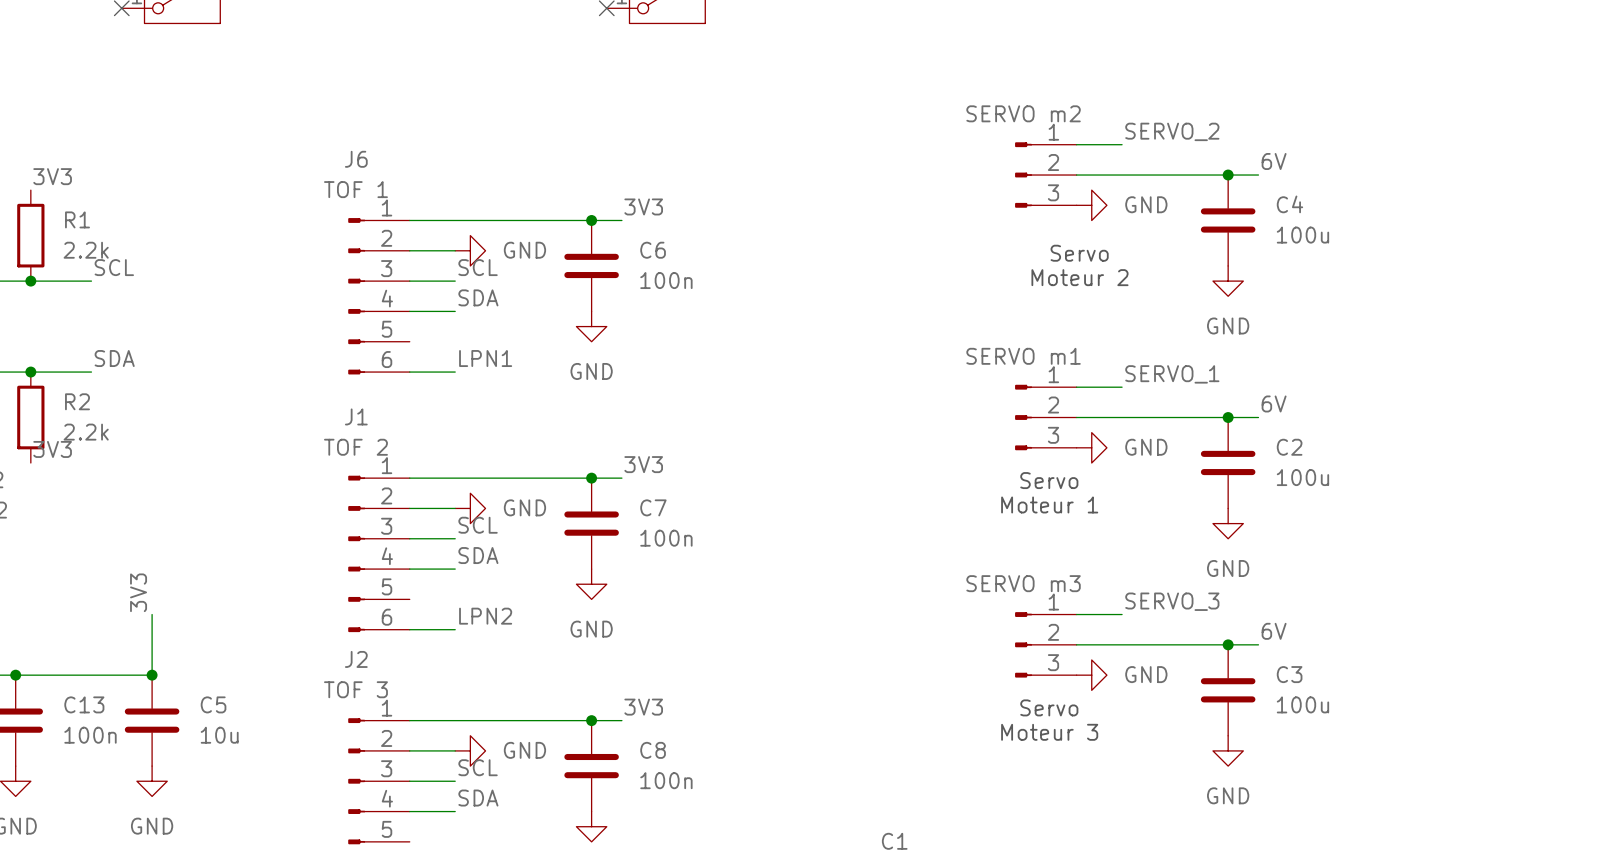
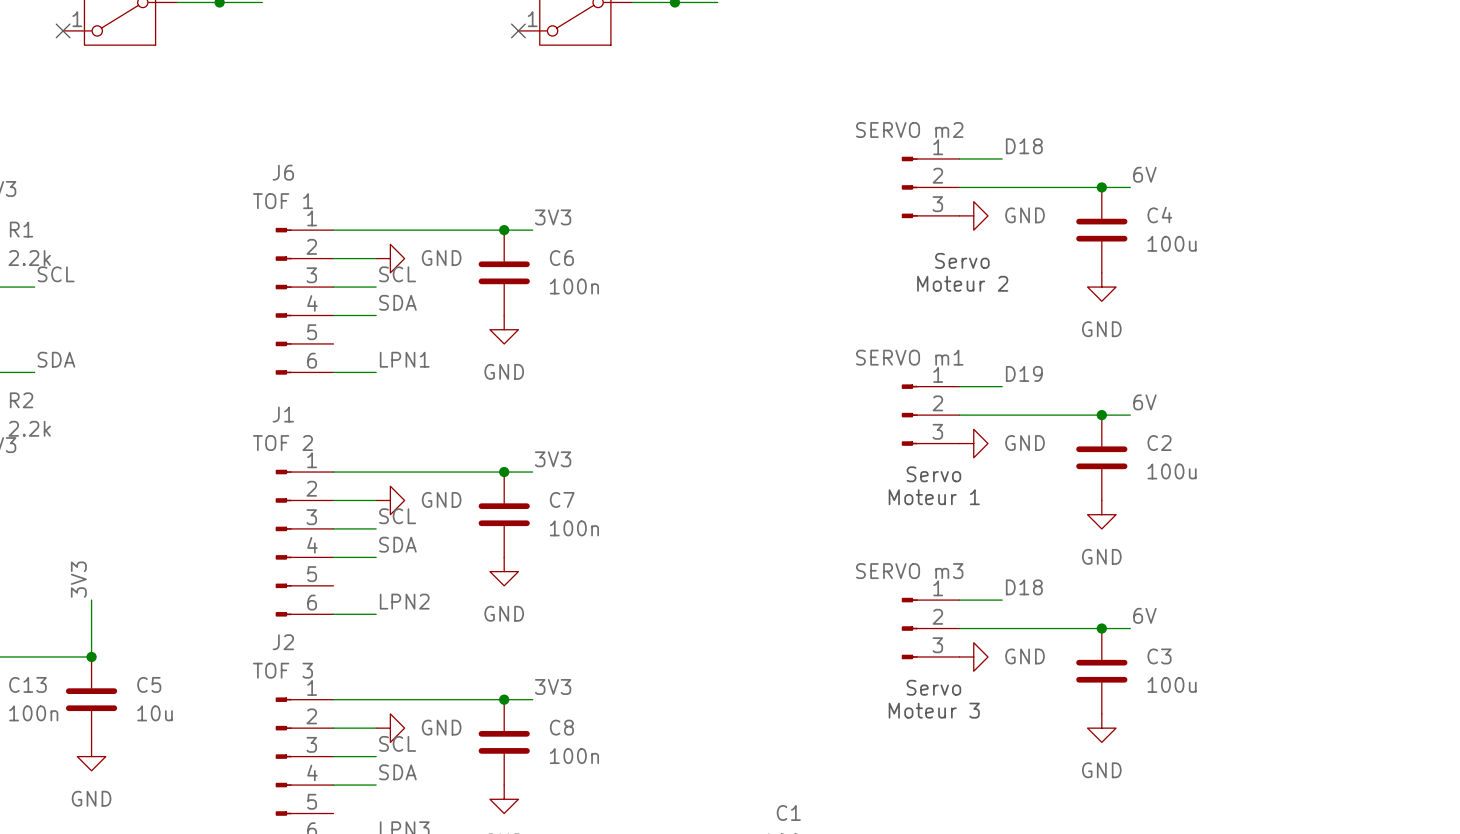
label: SERVO_2 (1172, 131) -> D18 (1024, 146)
label: SERVO_1 (1172, 374) -> D19 (1024, 373)
label: SERVO_3 (1172, 601) -> D18 (1024, 587)

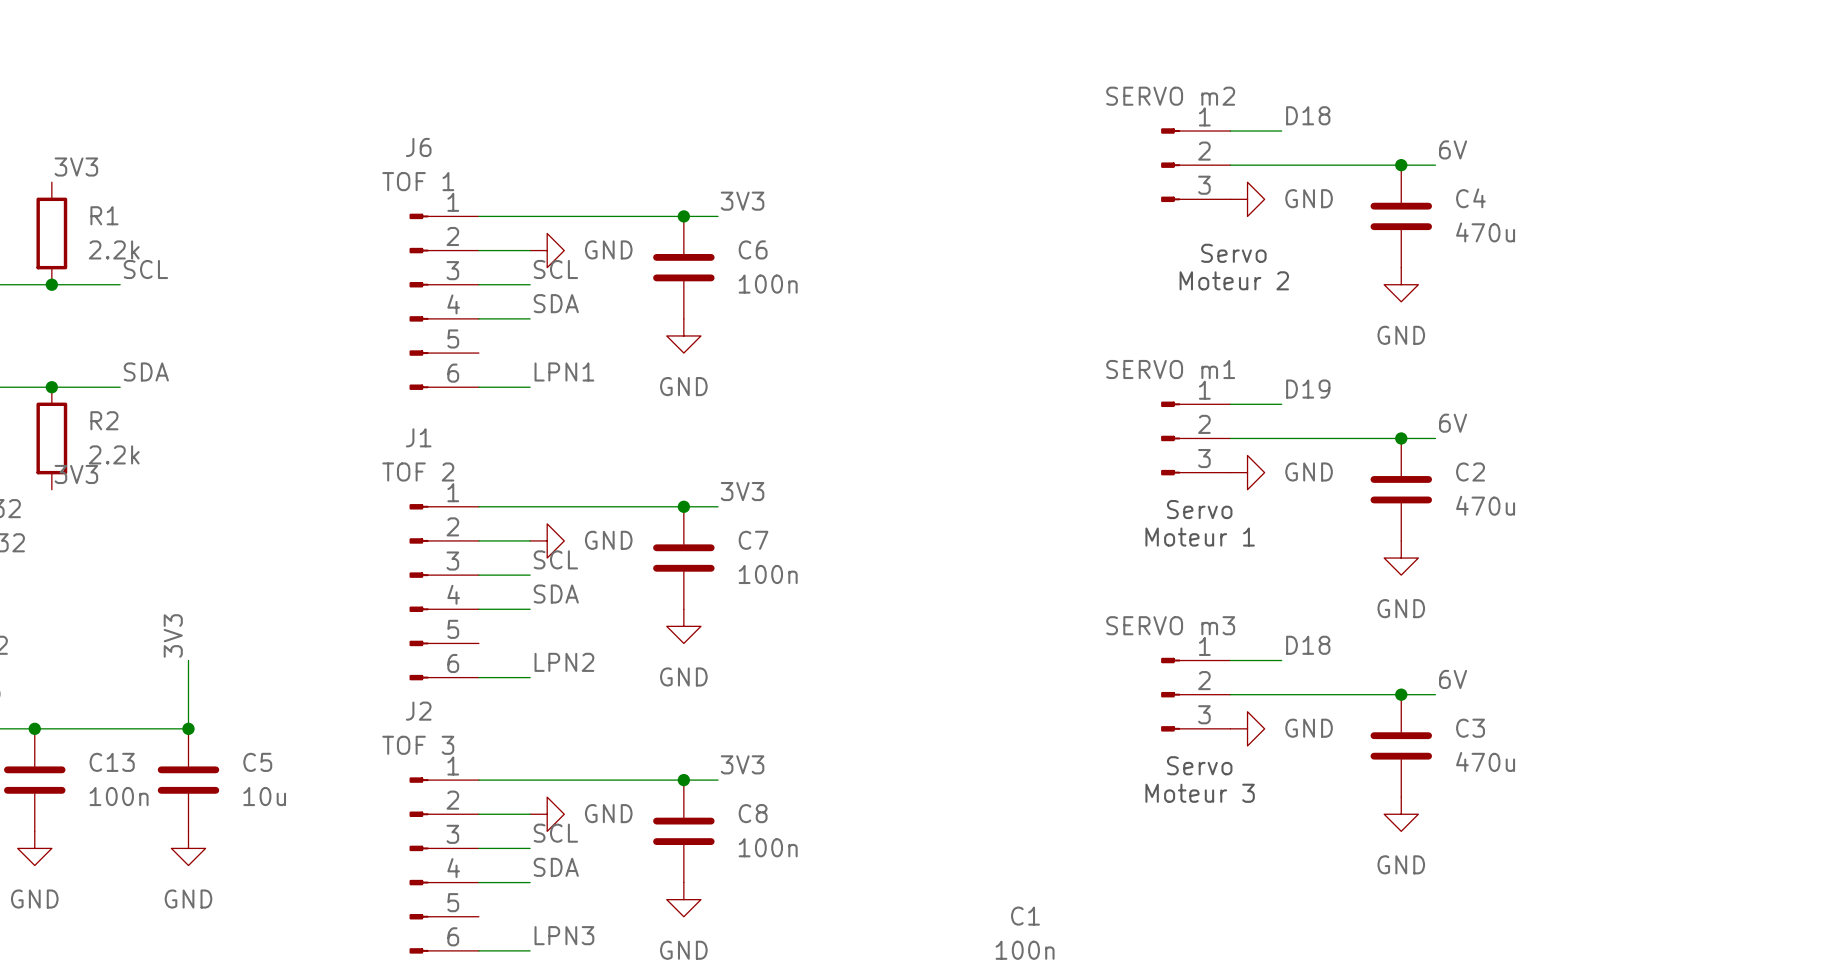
C4 value: 100u (1172, 243) -> 470u (1485, 232)
C2 value: 100u (1172, 471) -> 470u (1485, 505)
C3 value: 100u (1172, 684) -> 470u (1485, 761)

